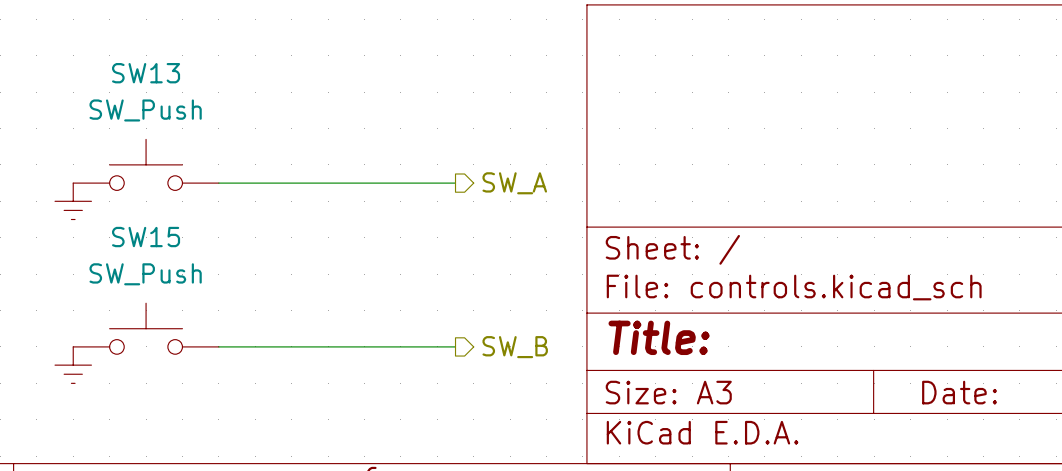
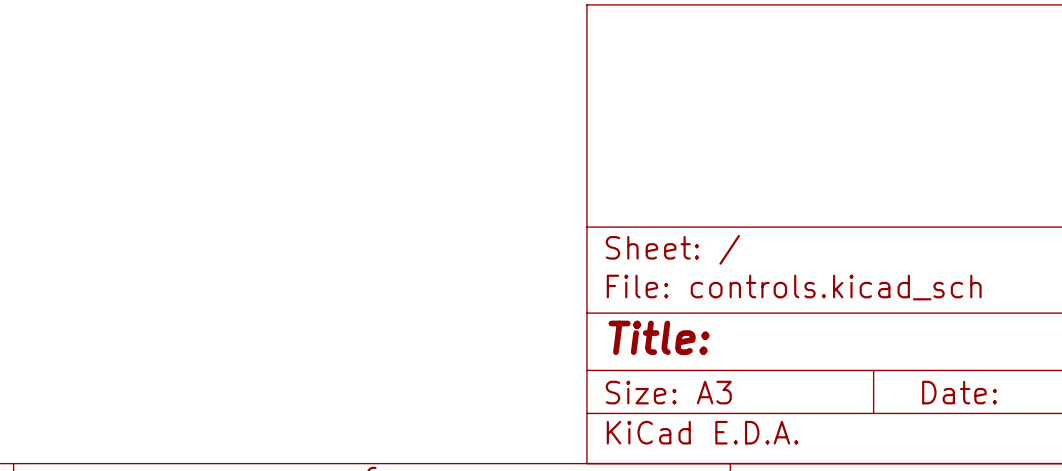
SW13: SW_Push (146, 164) -> none
wire: (218, 183) (455, 183) -> none
hierarchical label: SW_A (514, 183) -> none
power symbol: (73, 201) -> none
SW15: SW_Push (146, 328) -> none
wire: (218, 346) (455, 346) -> none
hierarchical label: SW_B (515, 347) -> none
power symbol: (73, 365) -> none

